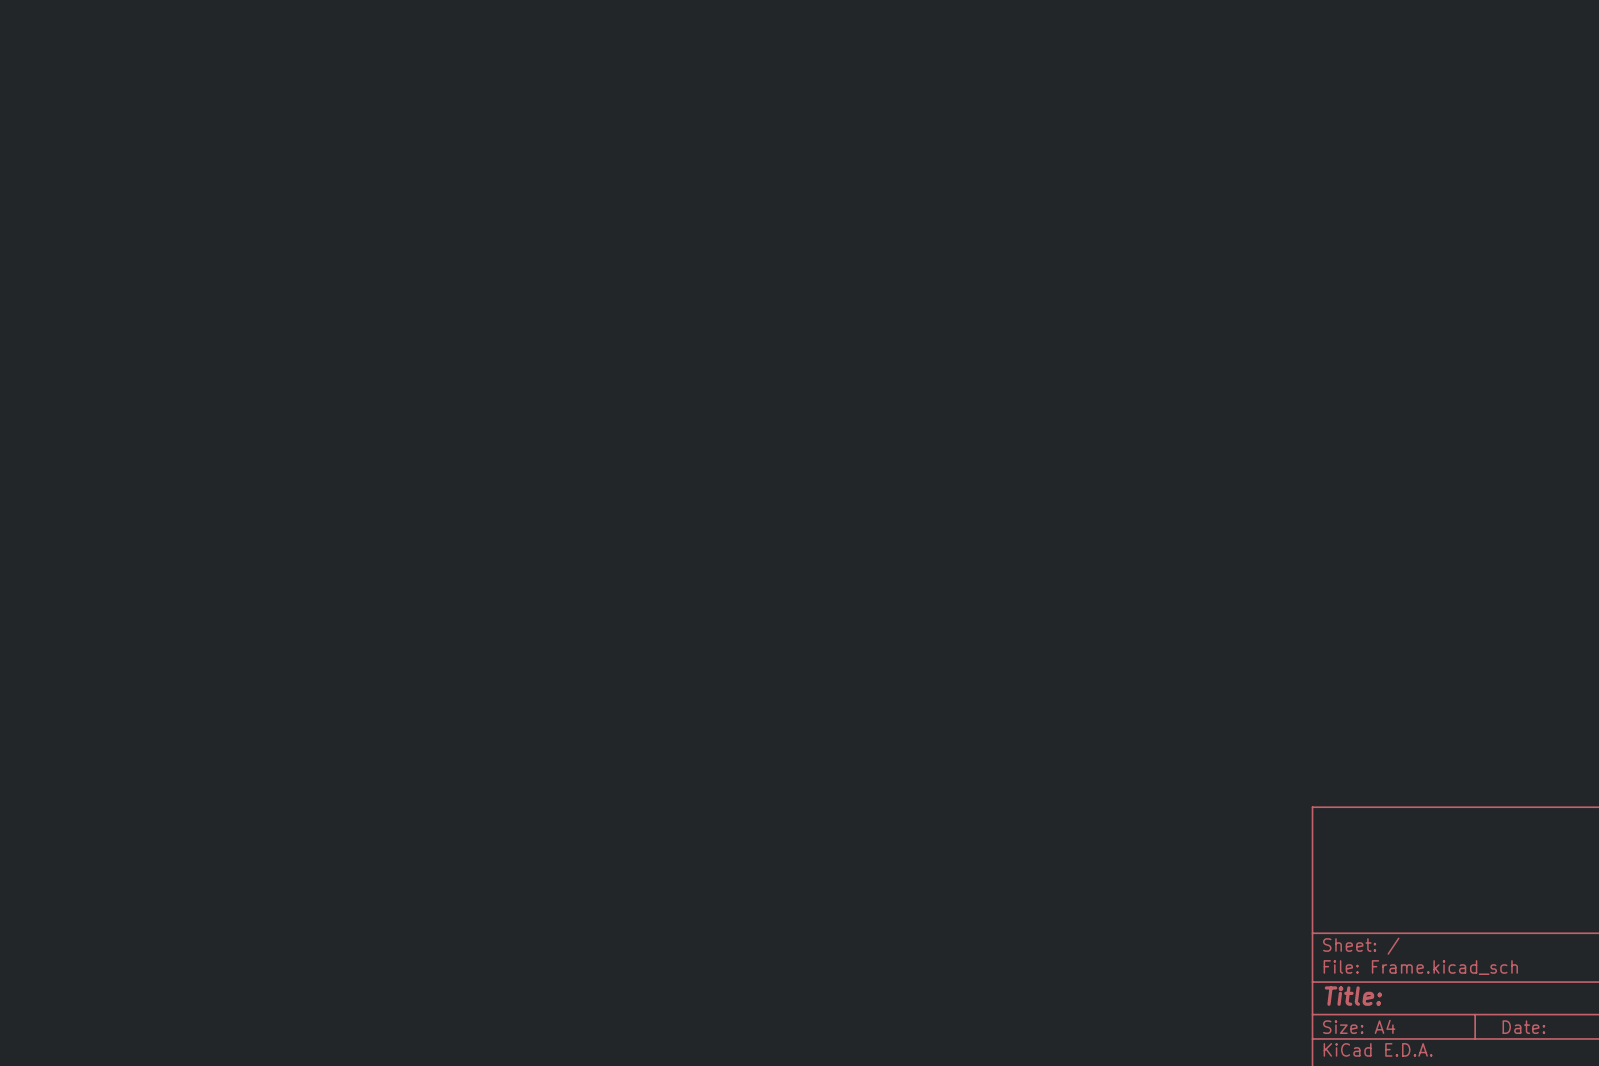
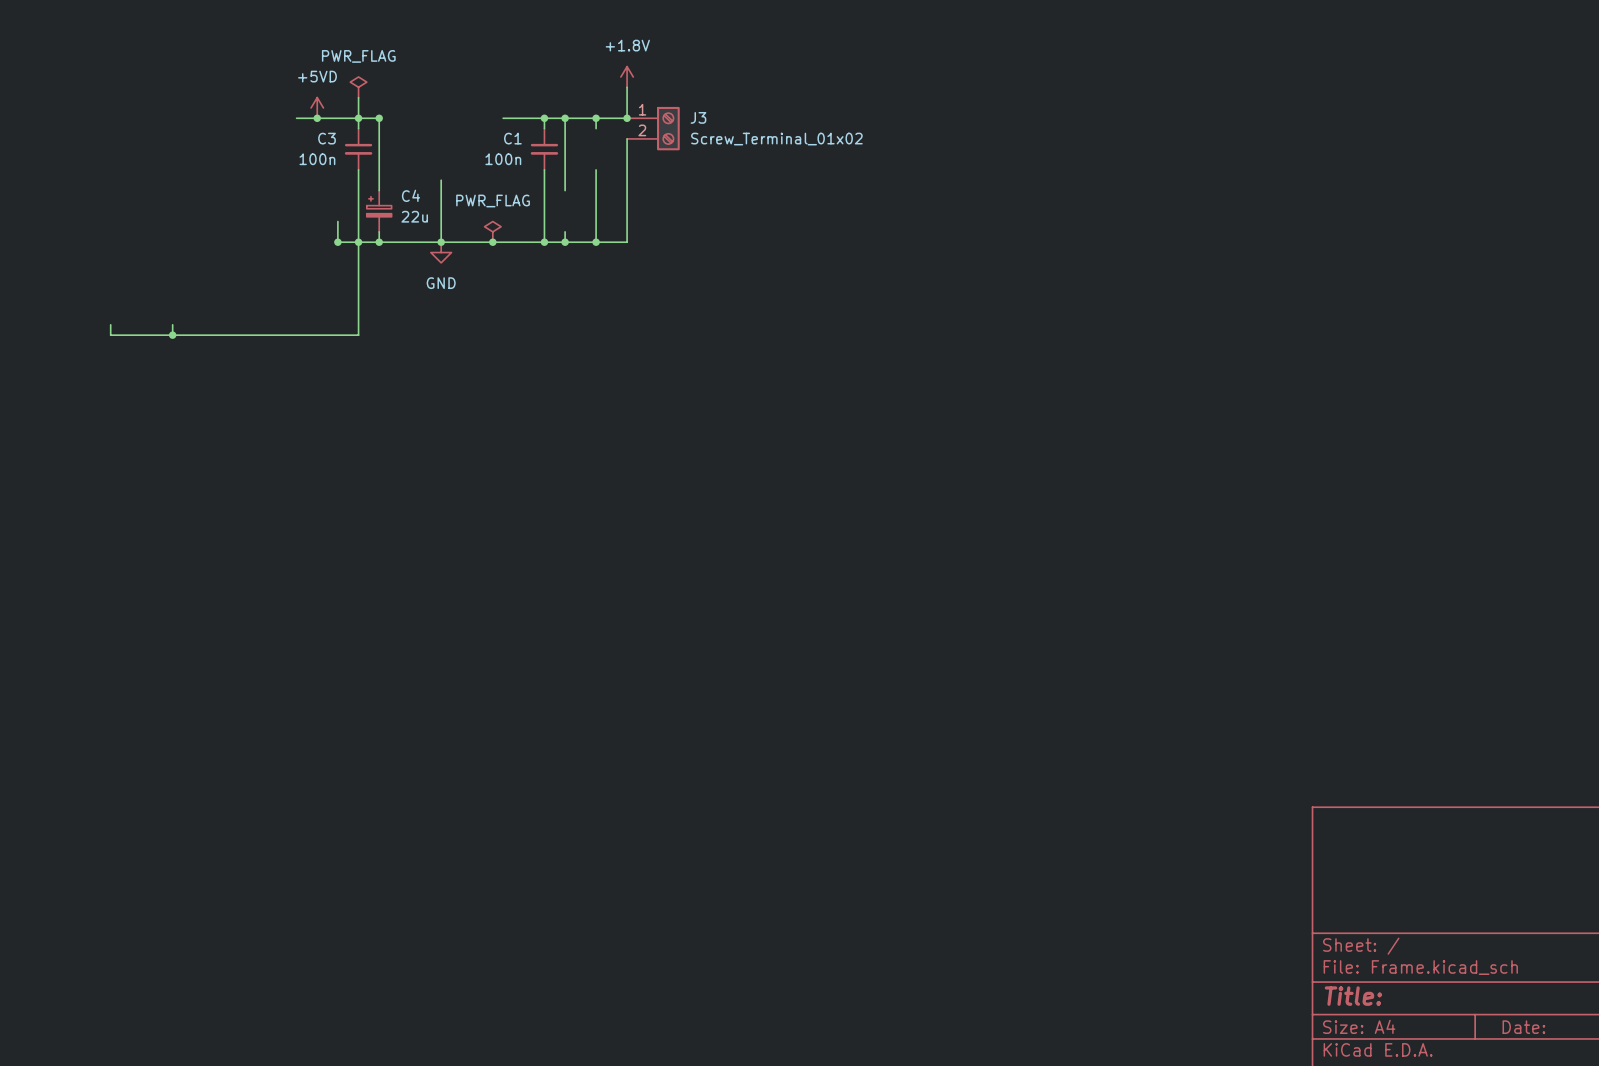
power symbol: none -> +1.8V (627, 76)
power symbol: none -> PWR_FLAG (358, 87)
wire: none -> (627, 87) (627, 118) (503, 118)
wire: none -> (358, 97) (358, 128)
power symbol: none -> +5VD (317, 107)
wire: none -> (296, 118) (379, 118) (379, 190)
junction: none -> (317, 118)
junction: none -> (358, 118)
junction: none -> (379, 118)
wire: none -> (544, 118) (544, 128)
junction: none -> (544, 118)
wire: none -> (565, 118) (565, 190)
junction: none -> (565, 118)
wire: none -> (596, 118) (596, 128)
junction: none -> (596, 118)
junction: none -> (627, 118)
J3: none -> Screw_Terminal_01x02 (653, 128)
wire: none -> (627, 138) (627, 242) (337, 242) (337, 221)
C3: none -> 100n (358, 149)
C1: none -> 100n (544, 149)
wire: none -> (358, 169) (358, 335) (110, 335) (110, 324)
wire: none -> (544, 169) (544, 242)
wire: none -> (596, 169) (596, 242)
wire: none -> (441, 180) (441, 242)
C4: none -> 22u (379, 211)
wire: none -> (379, 231) (379, 242)
power symbol: none -> PWR_FLAG (492, 231)
wire: none -> (565, 231) (565, 242)
junction: none -> (337, 242)
junction: none -> (358, 242)
junction: none -> (379, 242)
junction: none -> (441, 242)
junction: none -> (492, 242)
junction: none -> (544, 242)
junction: none -> (565, 242)
junction: none -> (596, 242)
power symbol: none -> GND (441, 252)
wire: none -> (172, 324) (172, 335)
junction: none -> (172, 335)

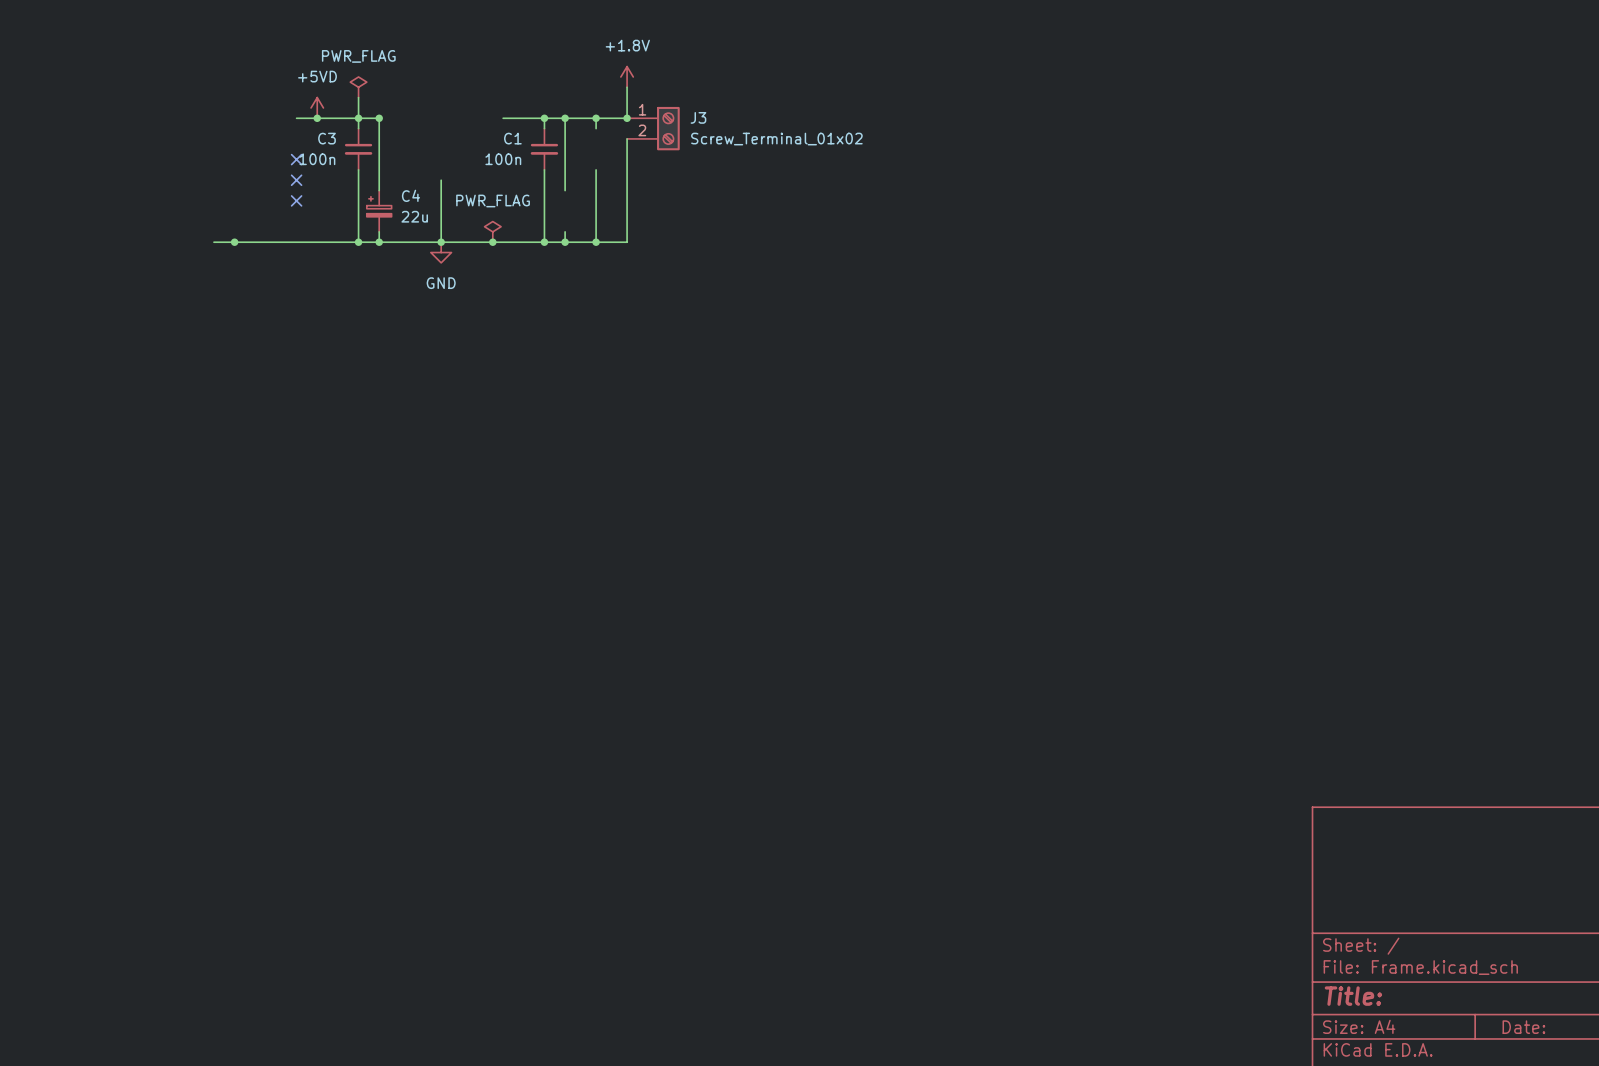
no-connect mark: none -> (296, 159)
no-connect mark: none -> (296, 180)
no-connect mark: none -> (296, 200)
wire: (337, 221) (337, 242) -> (213, 242) (337, 242)
junction: none -> (234, 242)
junction: (337, 242) -> none
wire: (358, 242) (358, 335) (110, 335) (110, 324) -> none
wire: (172, 324) (172, 335) -> none
junction: (172, 335) -> none

